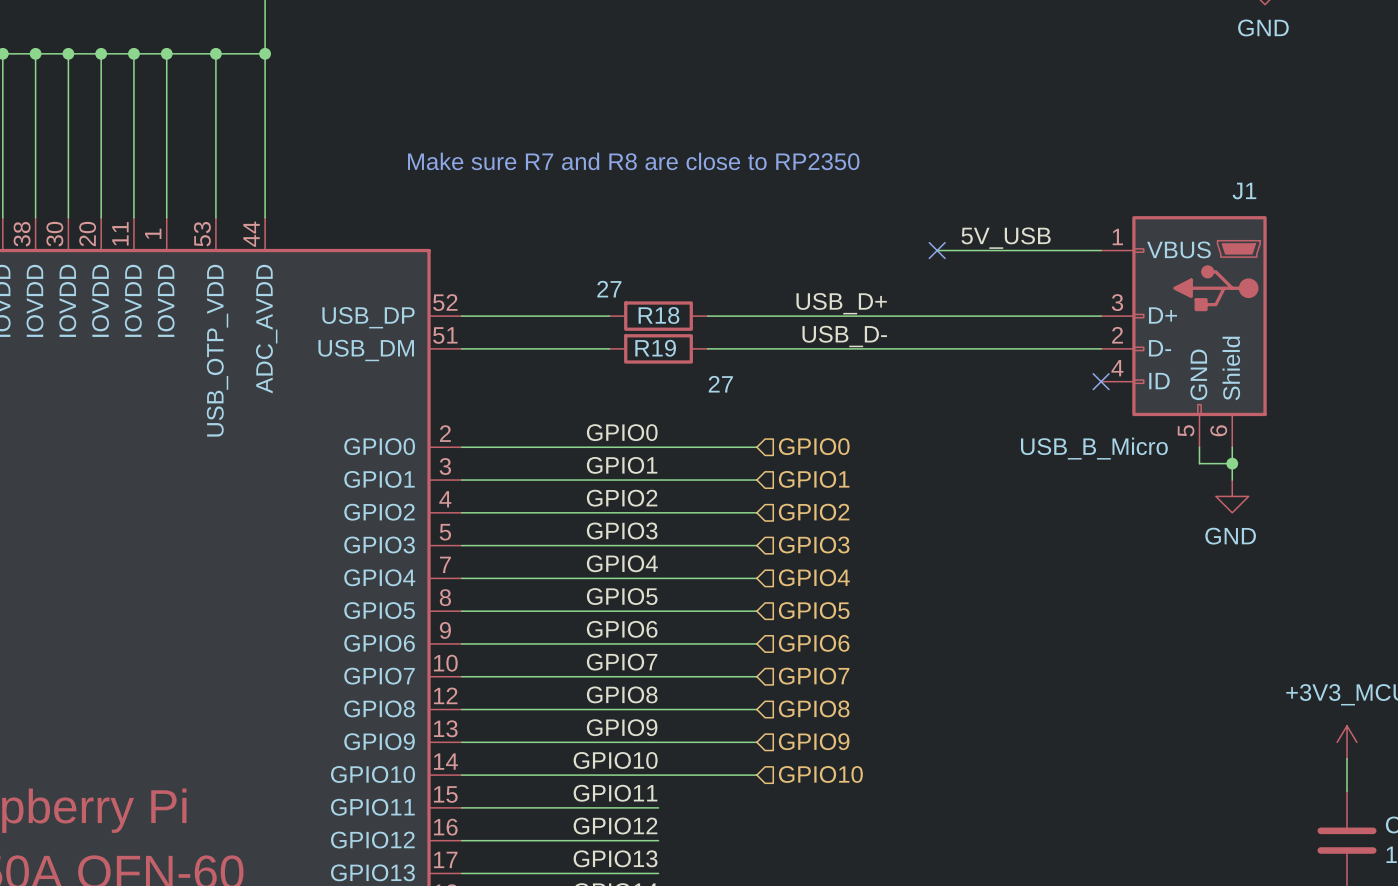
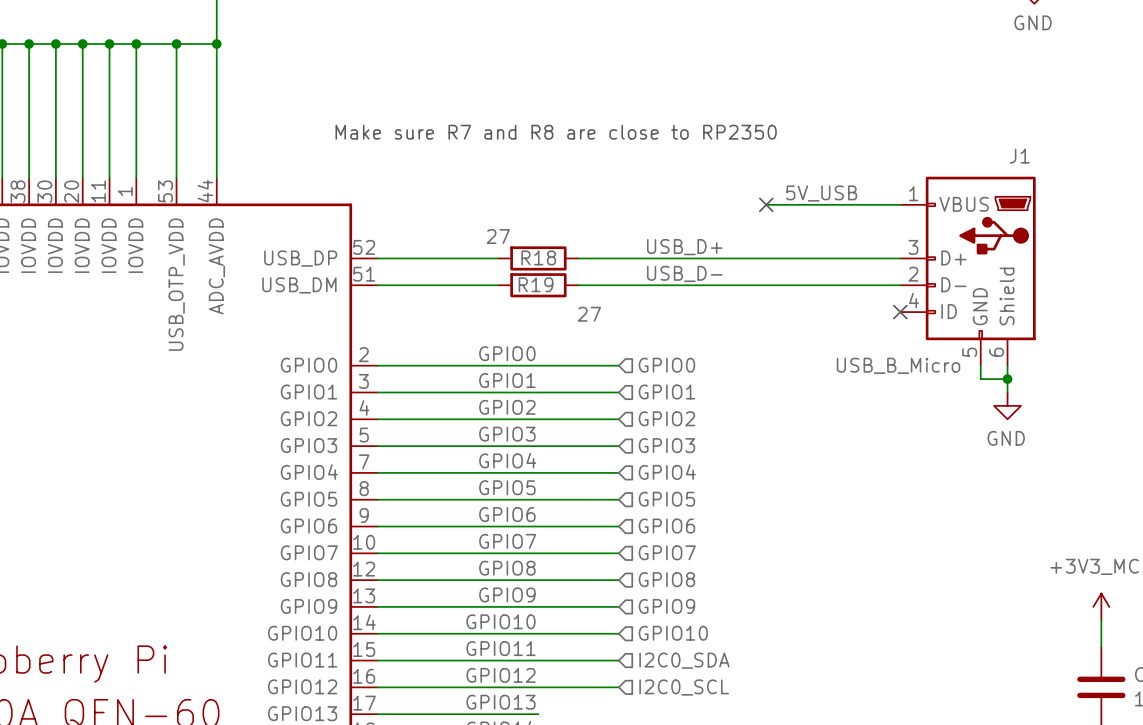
wire: none -> (538, 660) (618, 660)
hierarchical label: none -> I2C0_SDA (684, 660)
wire: none -> (538, 687) (618, 687)
hierarchical label: none -> I2C0_SCL (684, 687)

